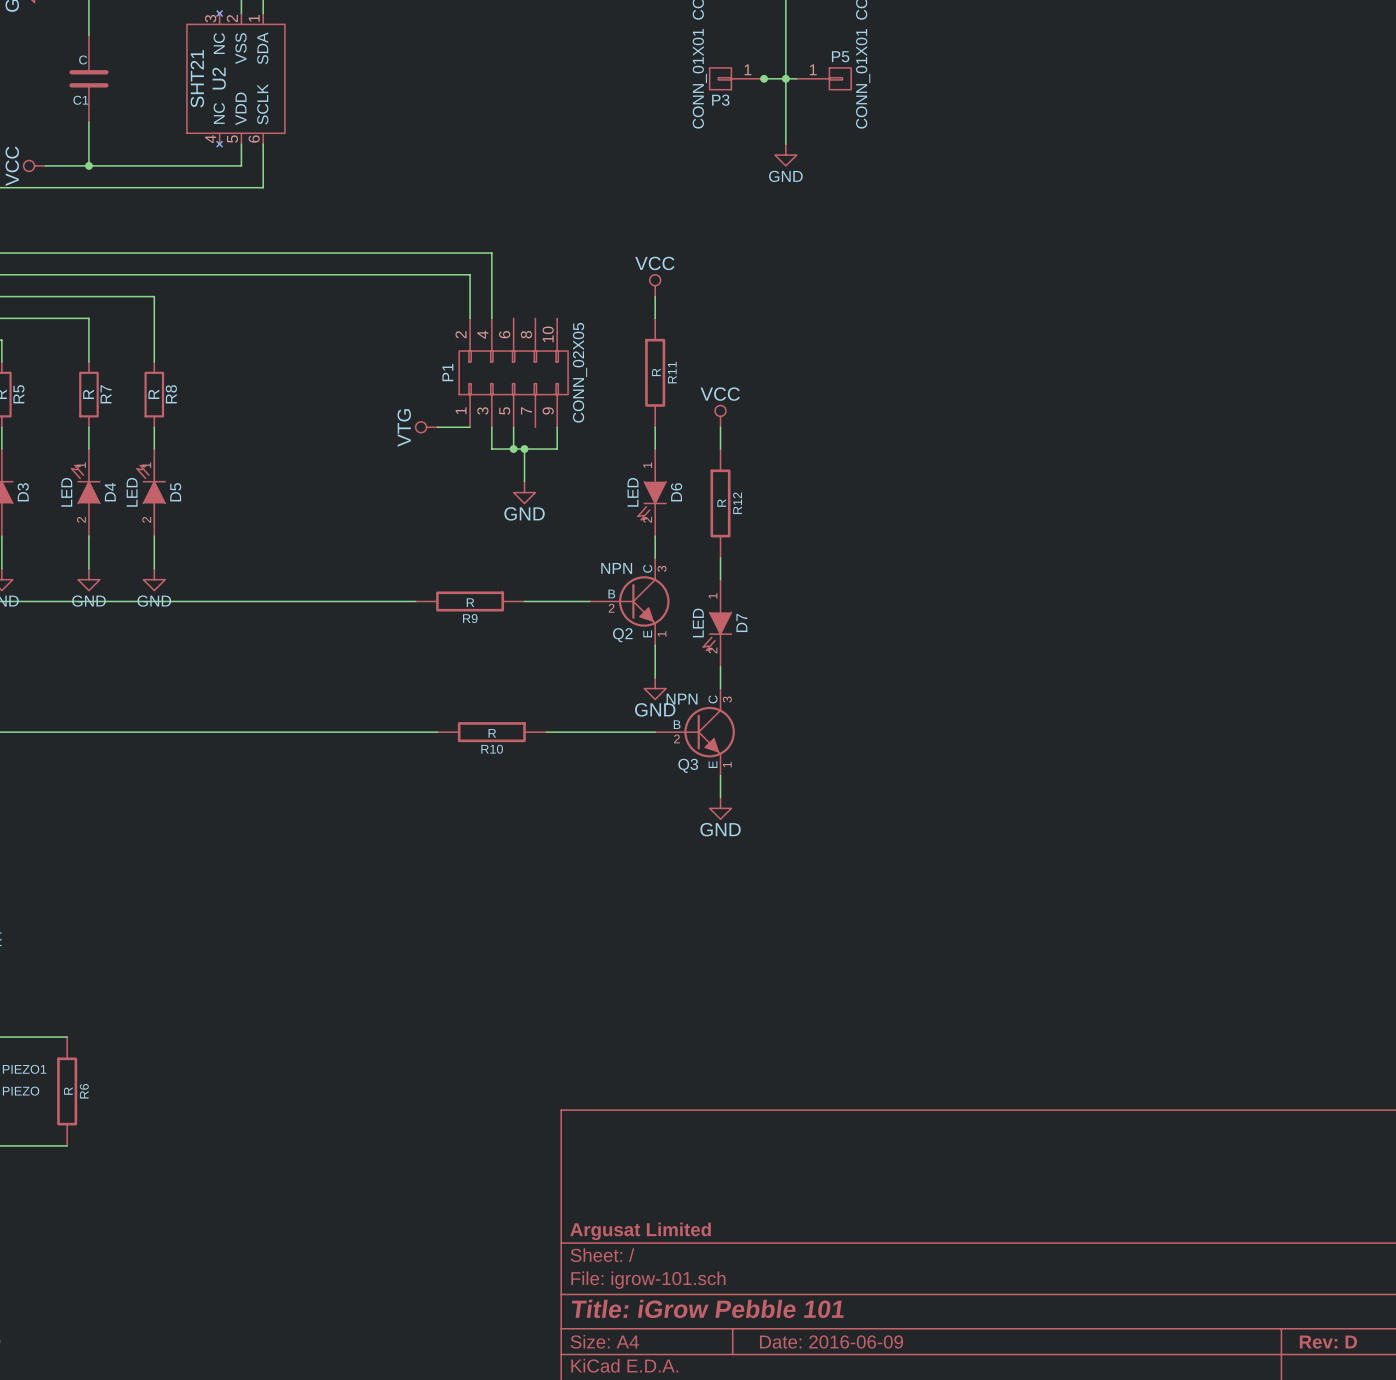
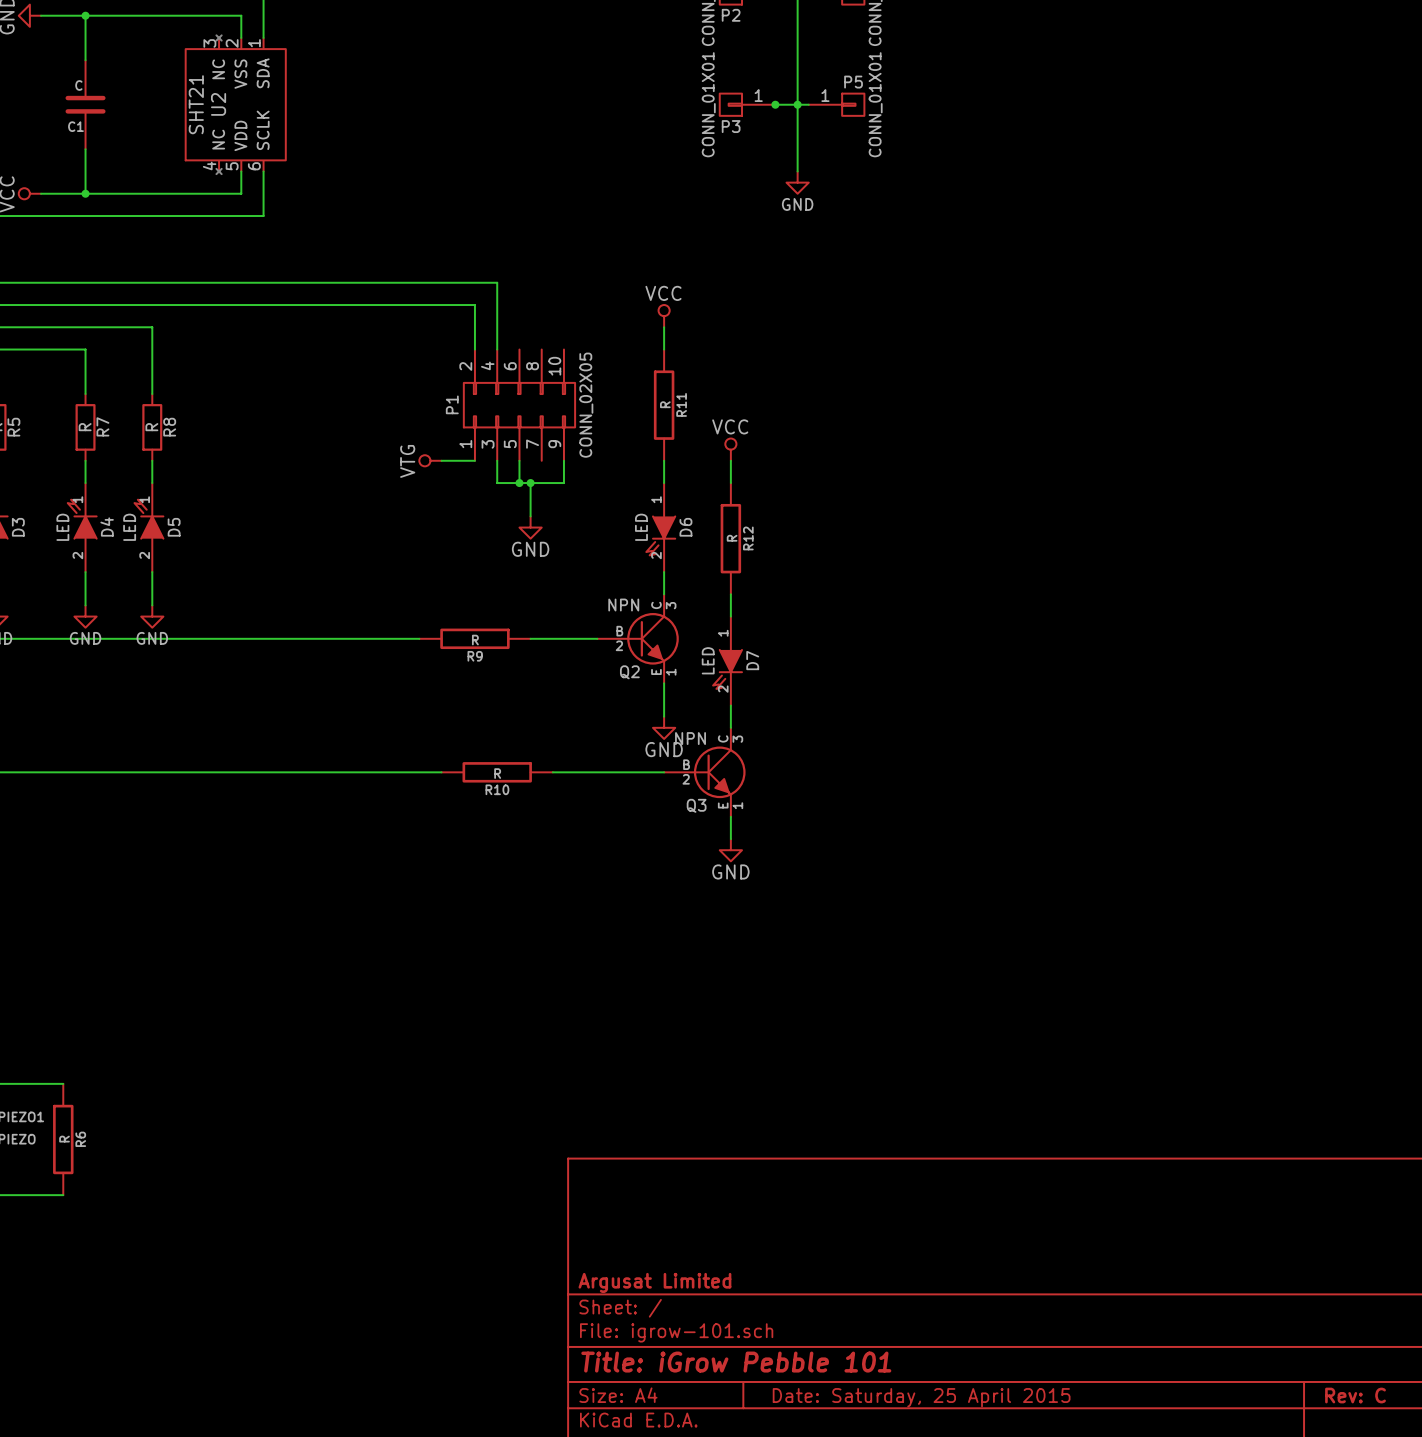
title block: Date: 2016-06-09 (831, 1342) -> Date: Saturday, 25 April 2015 (921, 1397)
title block: Rev: D (1328, 1342) -> Rev: C (1355, 1395)

